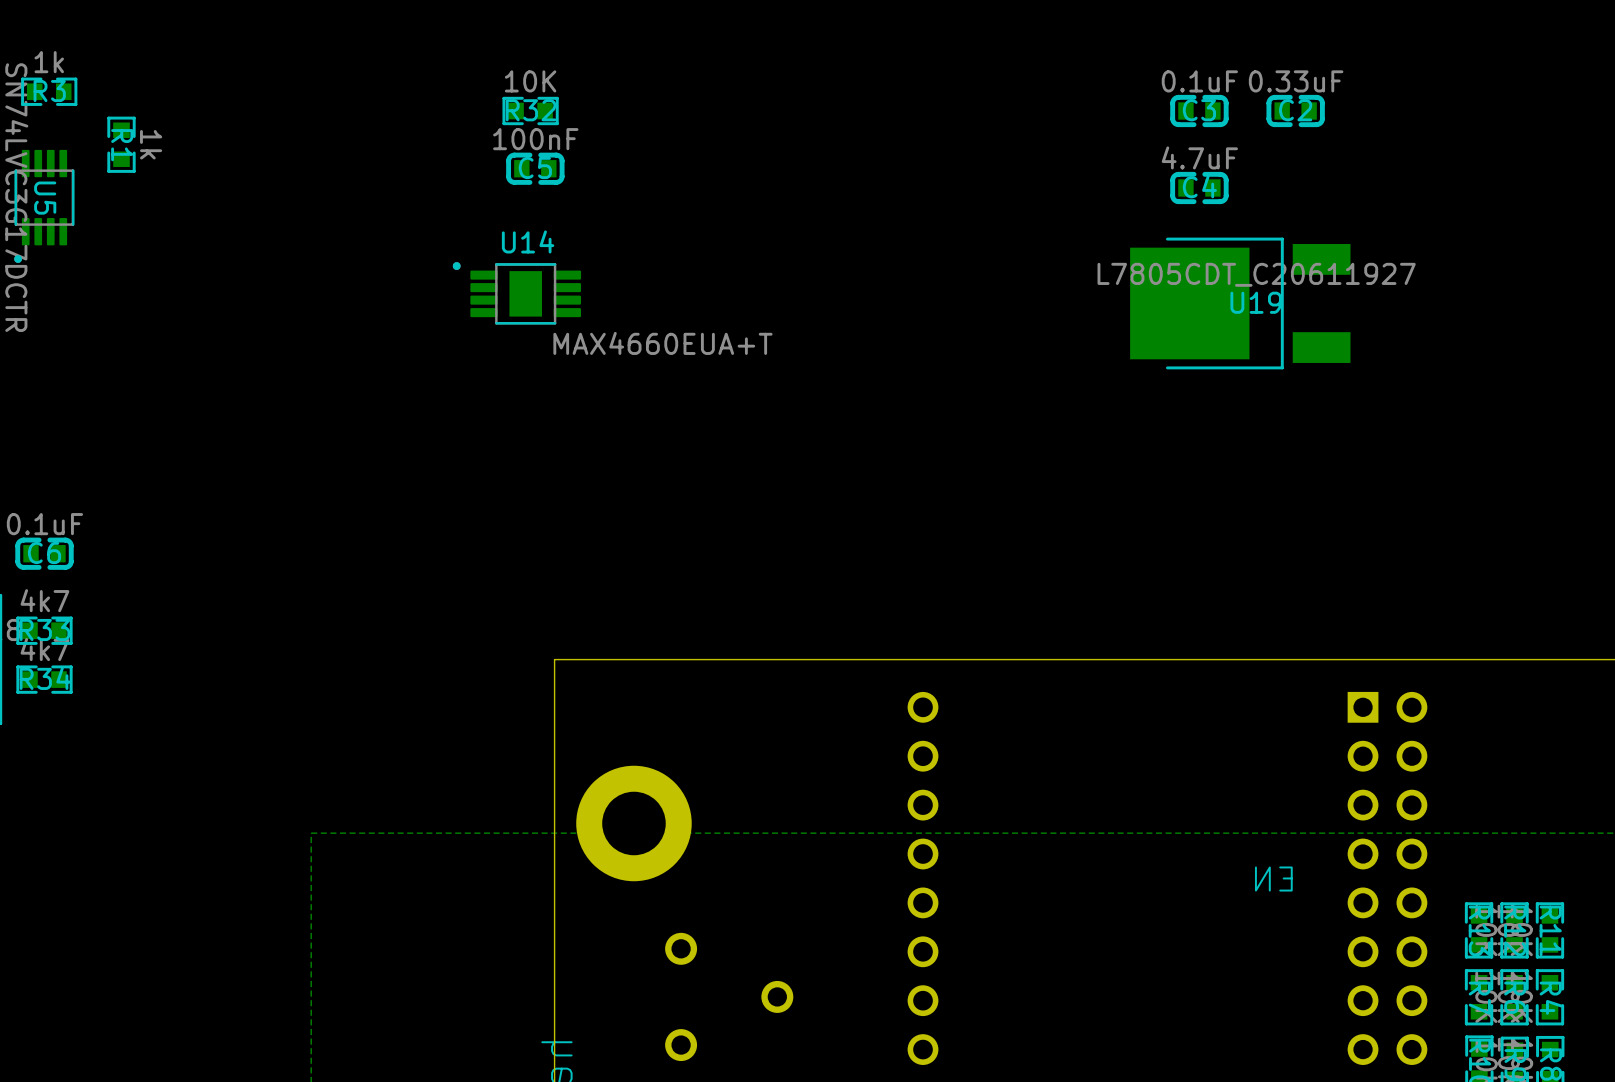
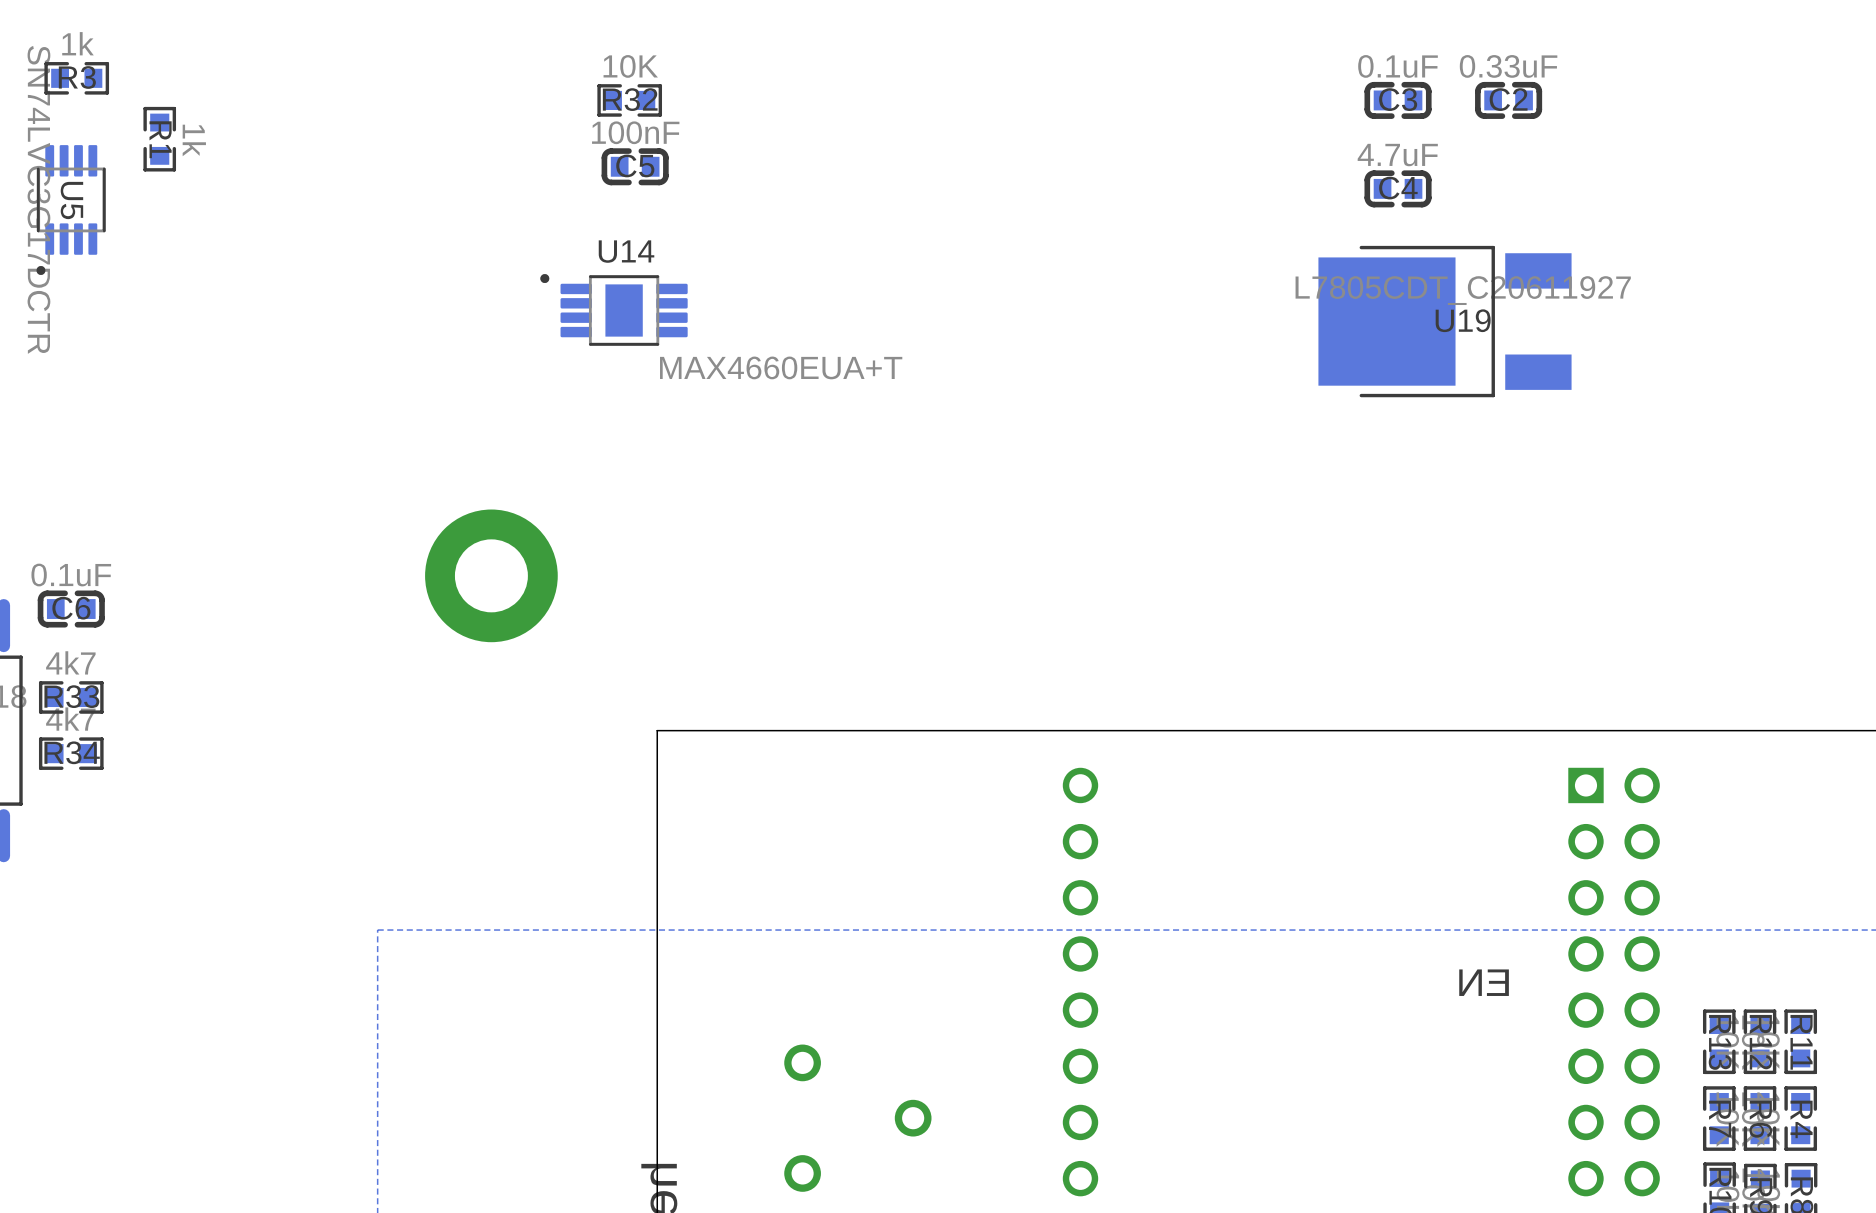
part position: (633, 823) -> (491, 575)

